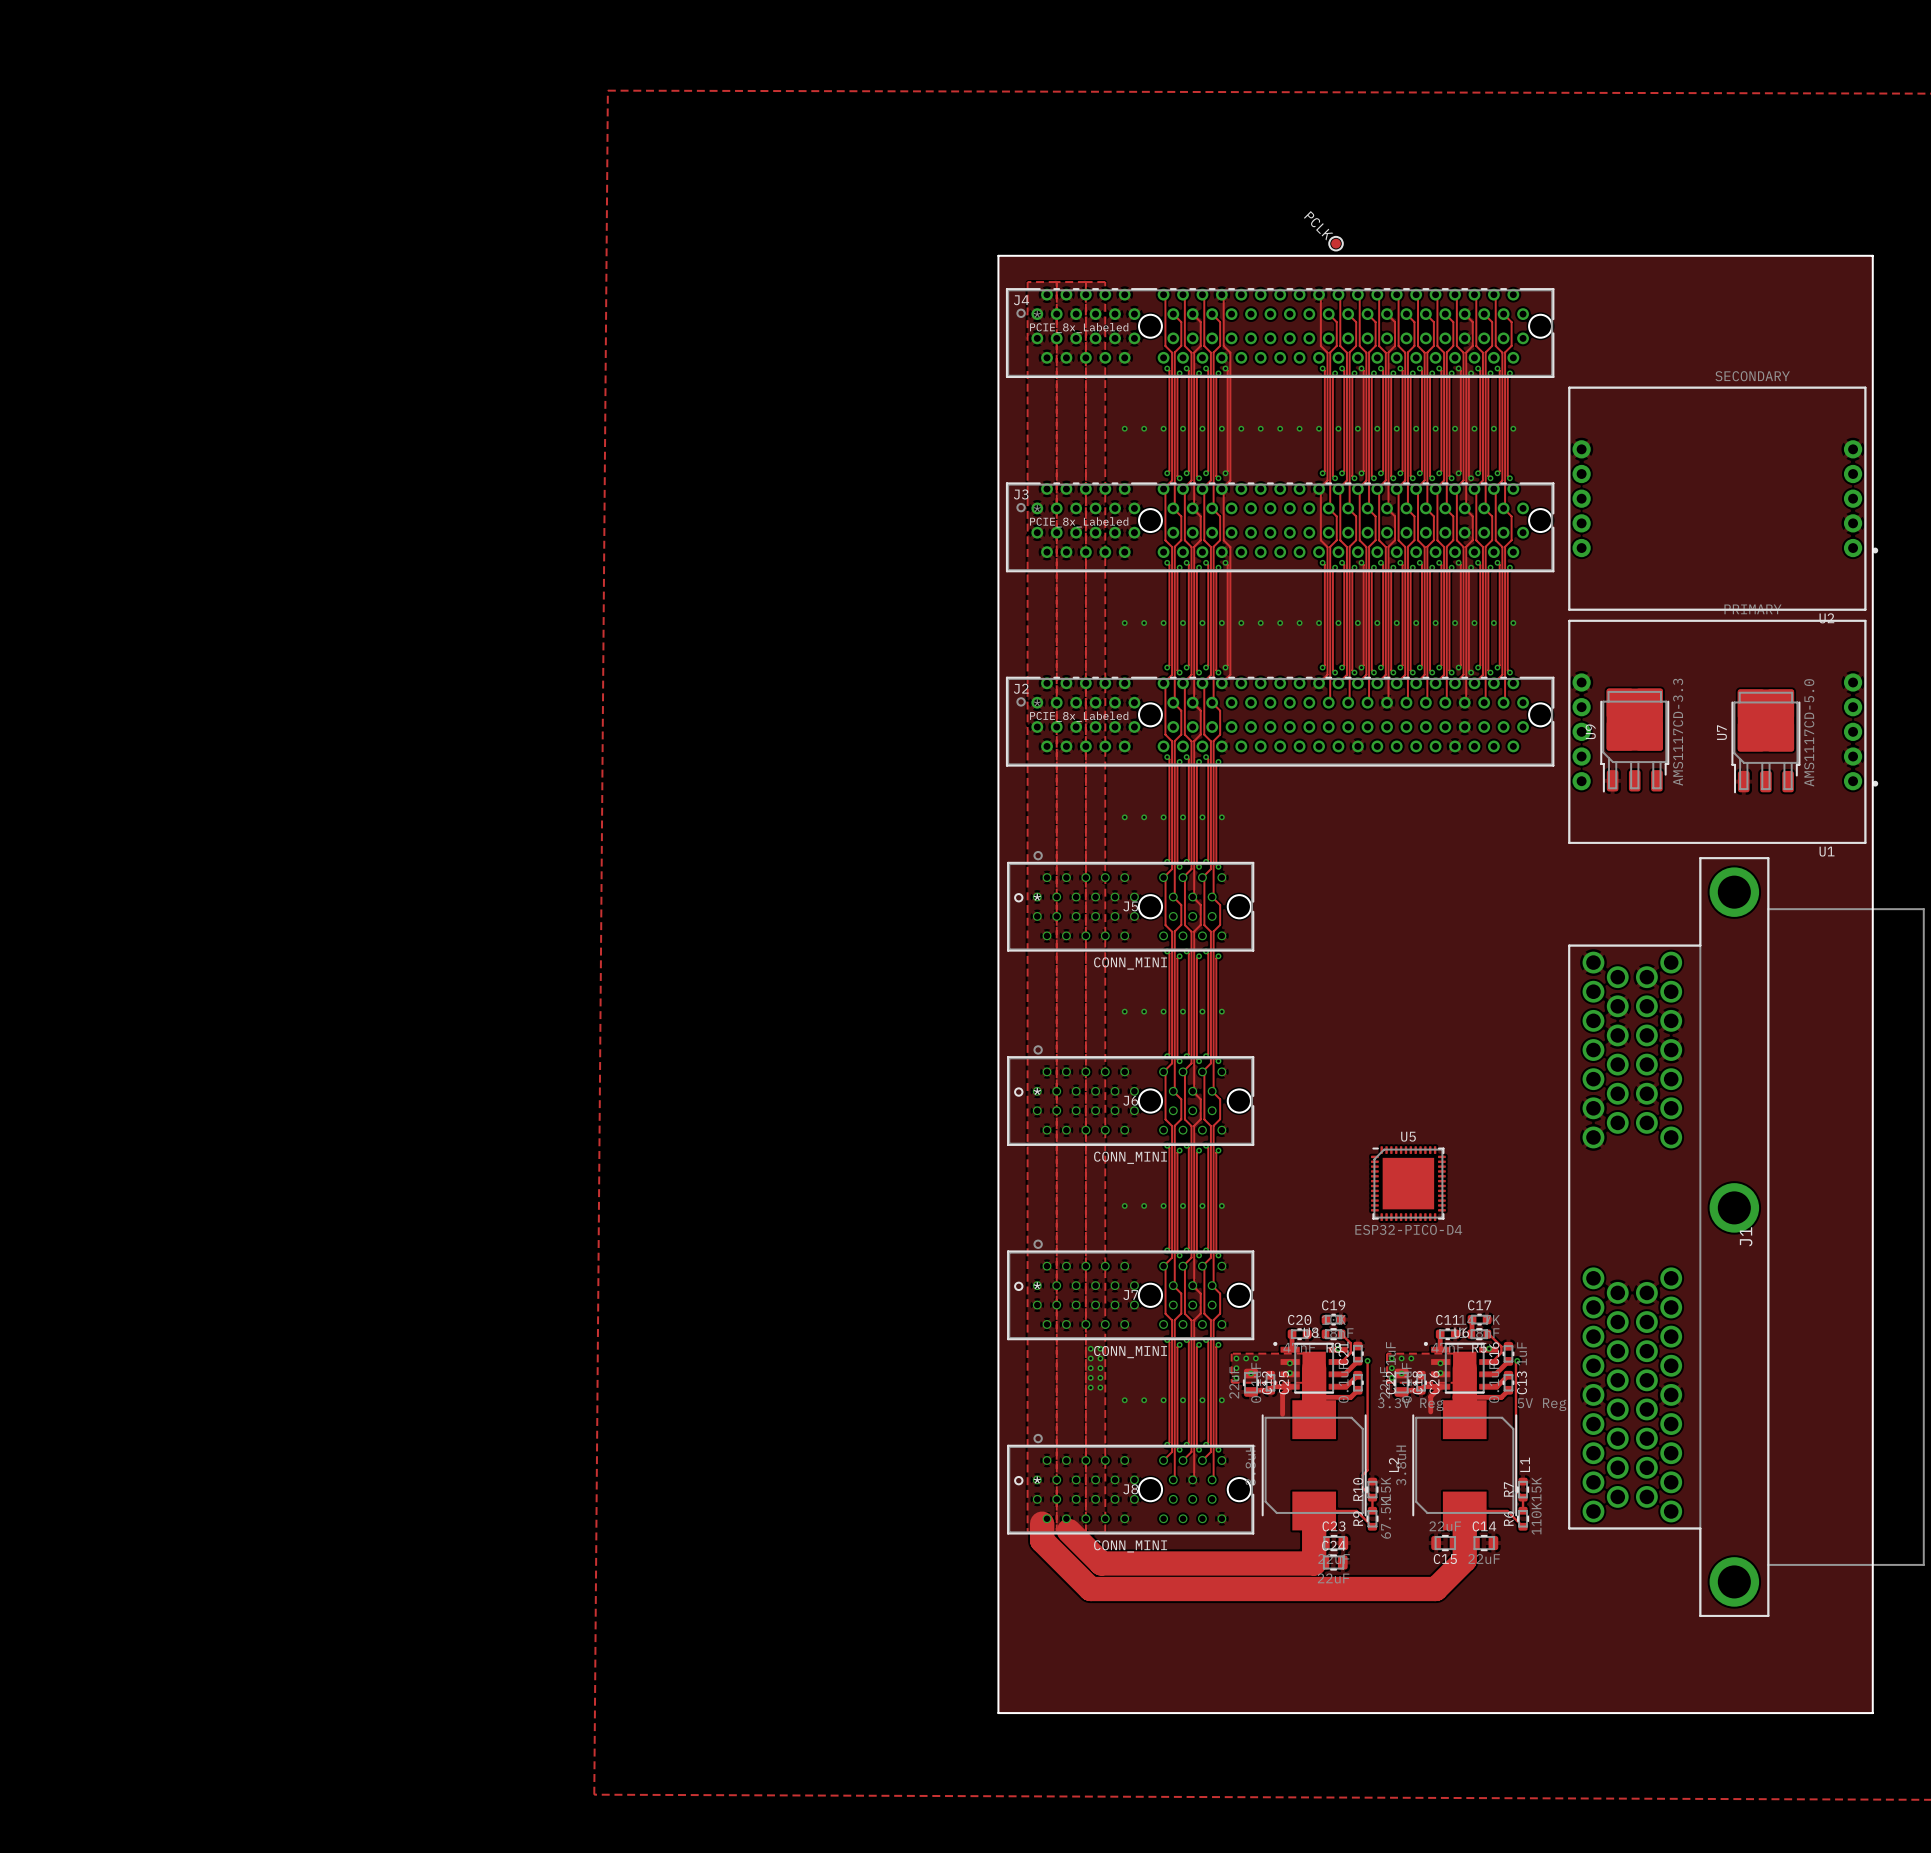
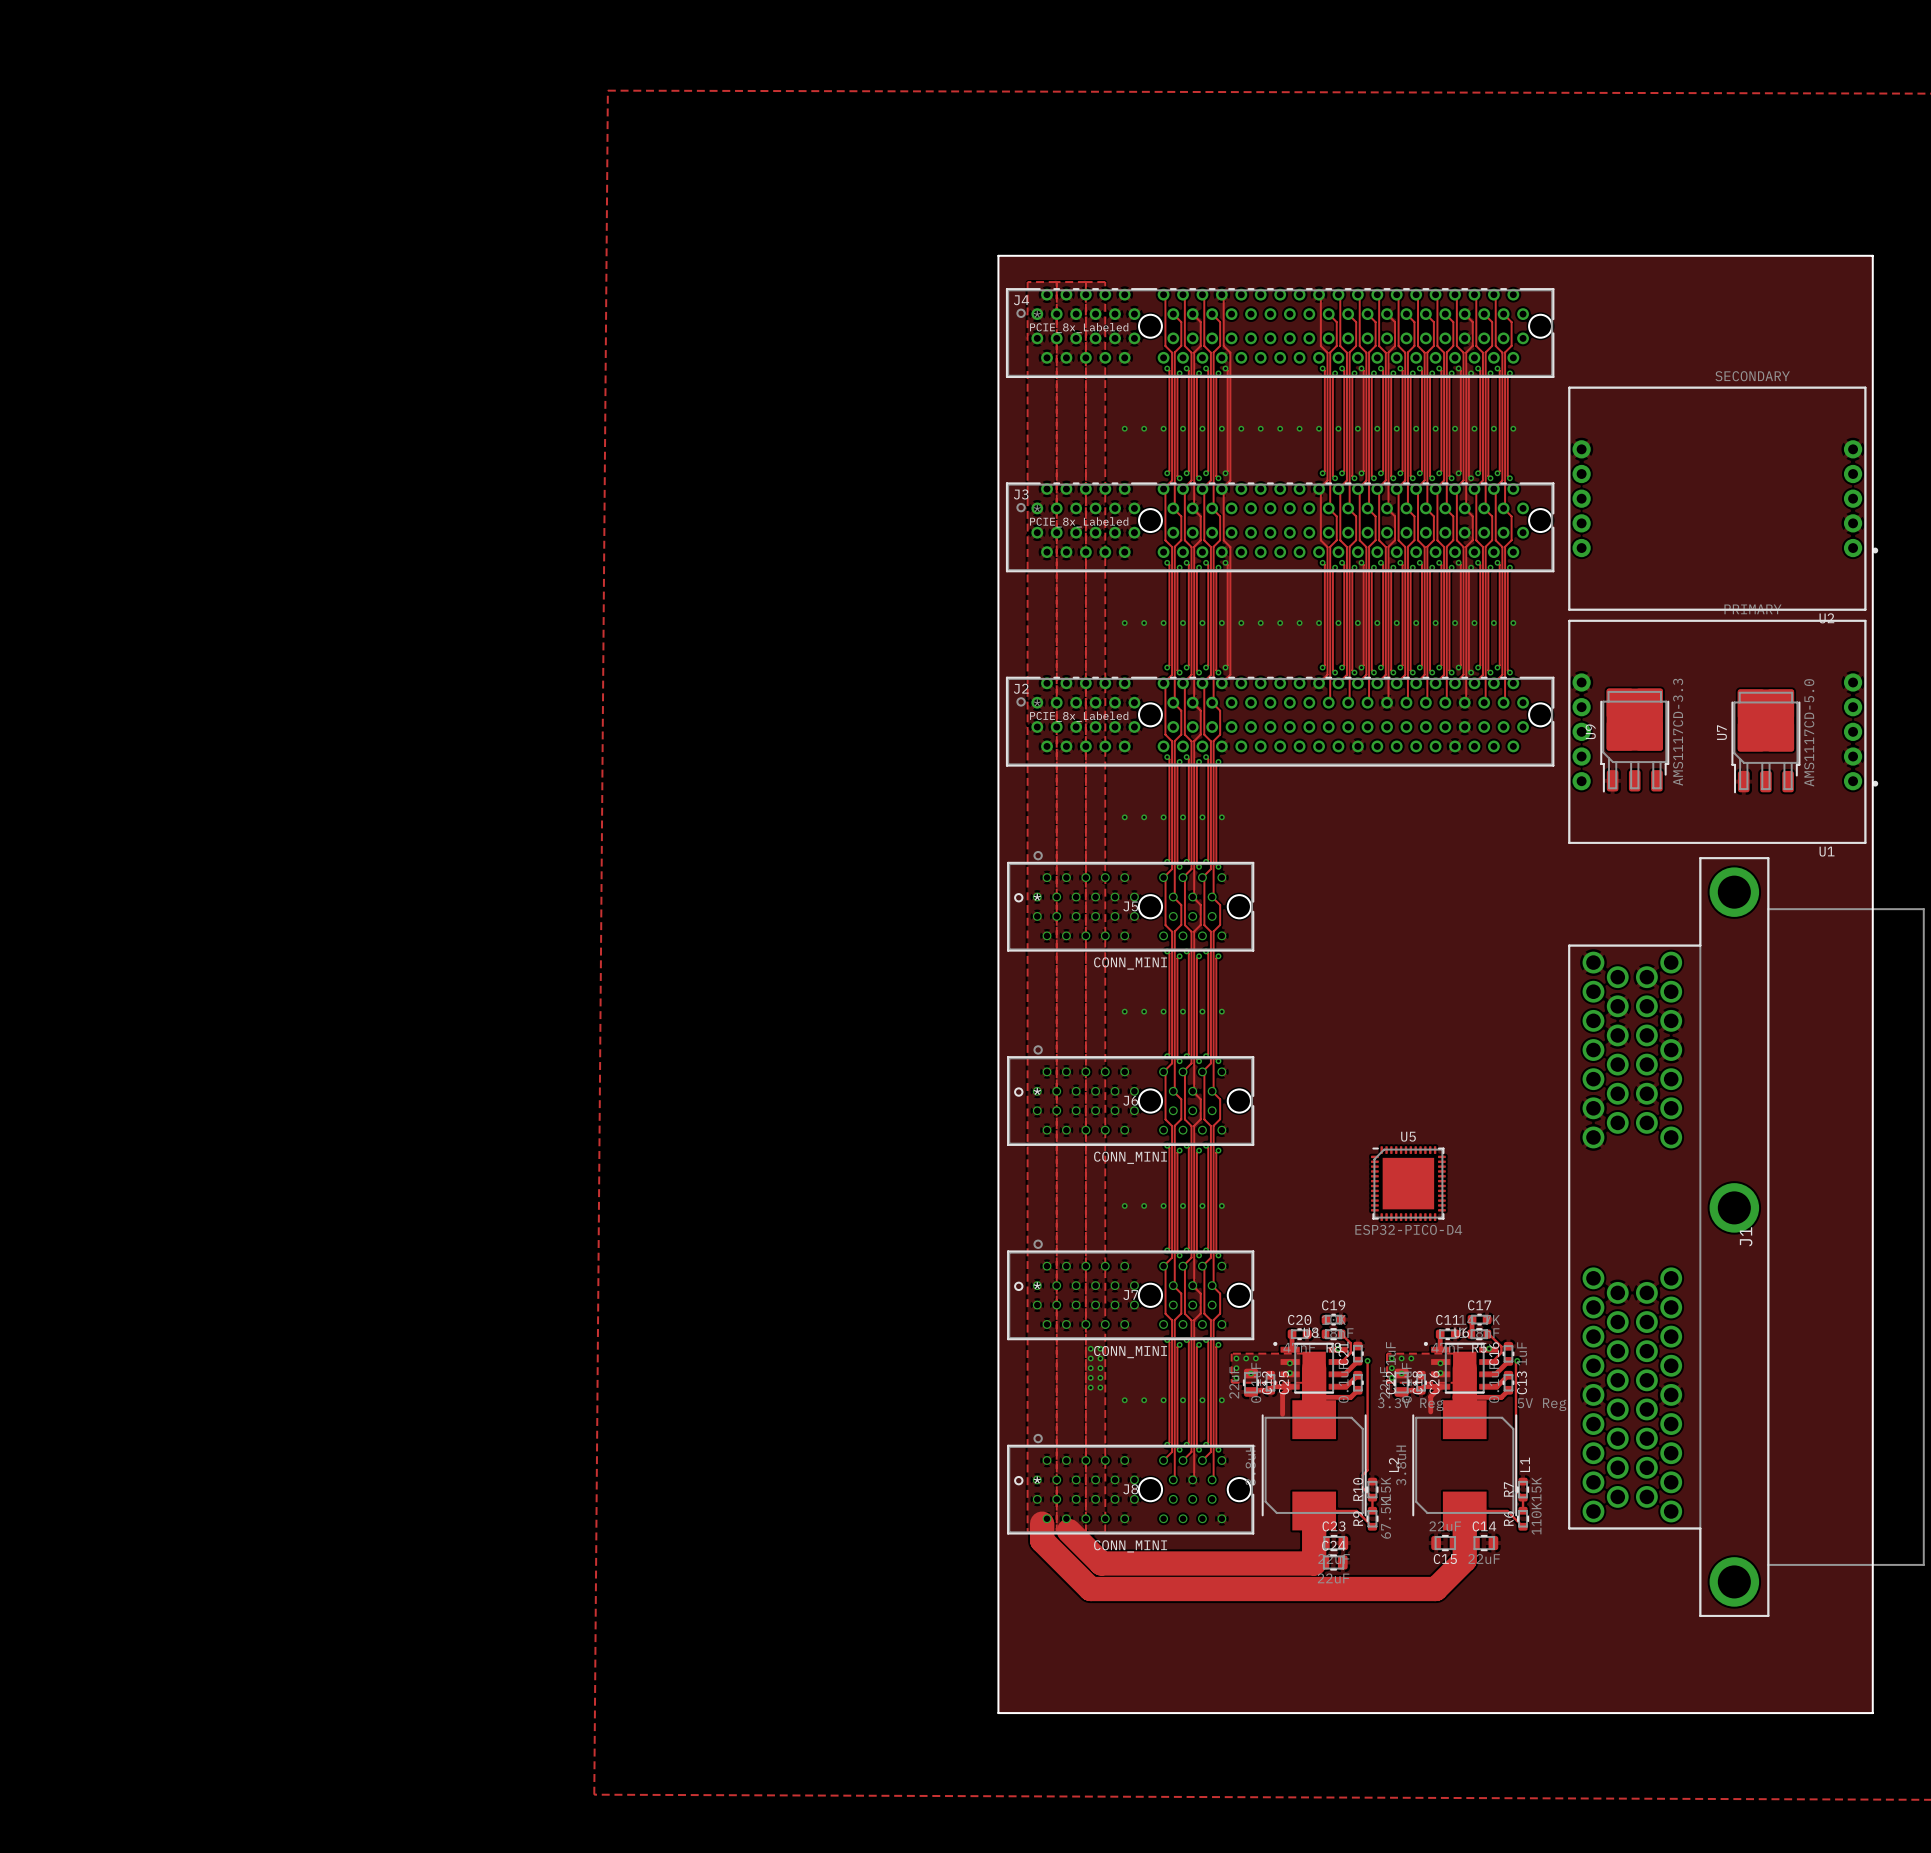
part: PCLK (1336, 243) -> none

